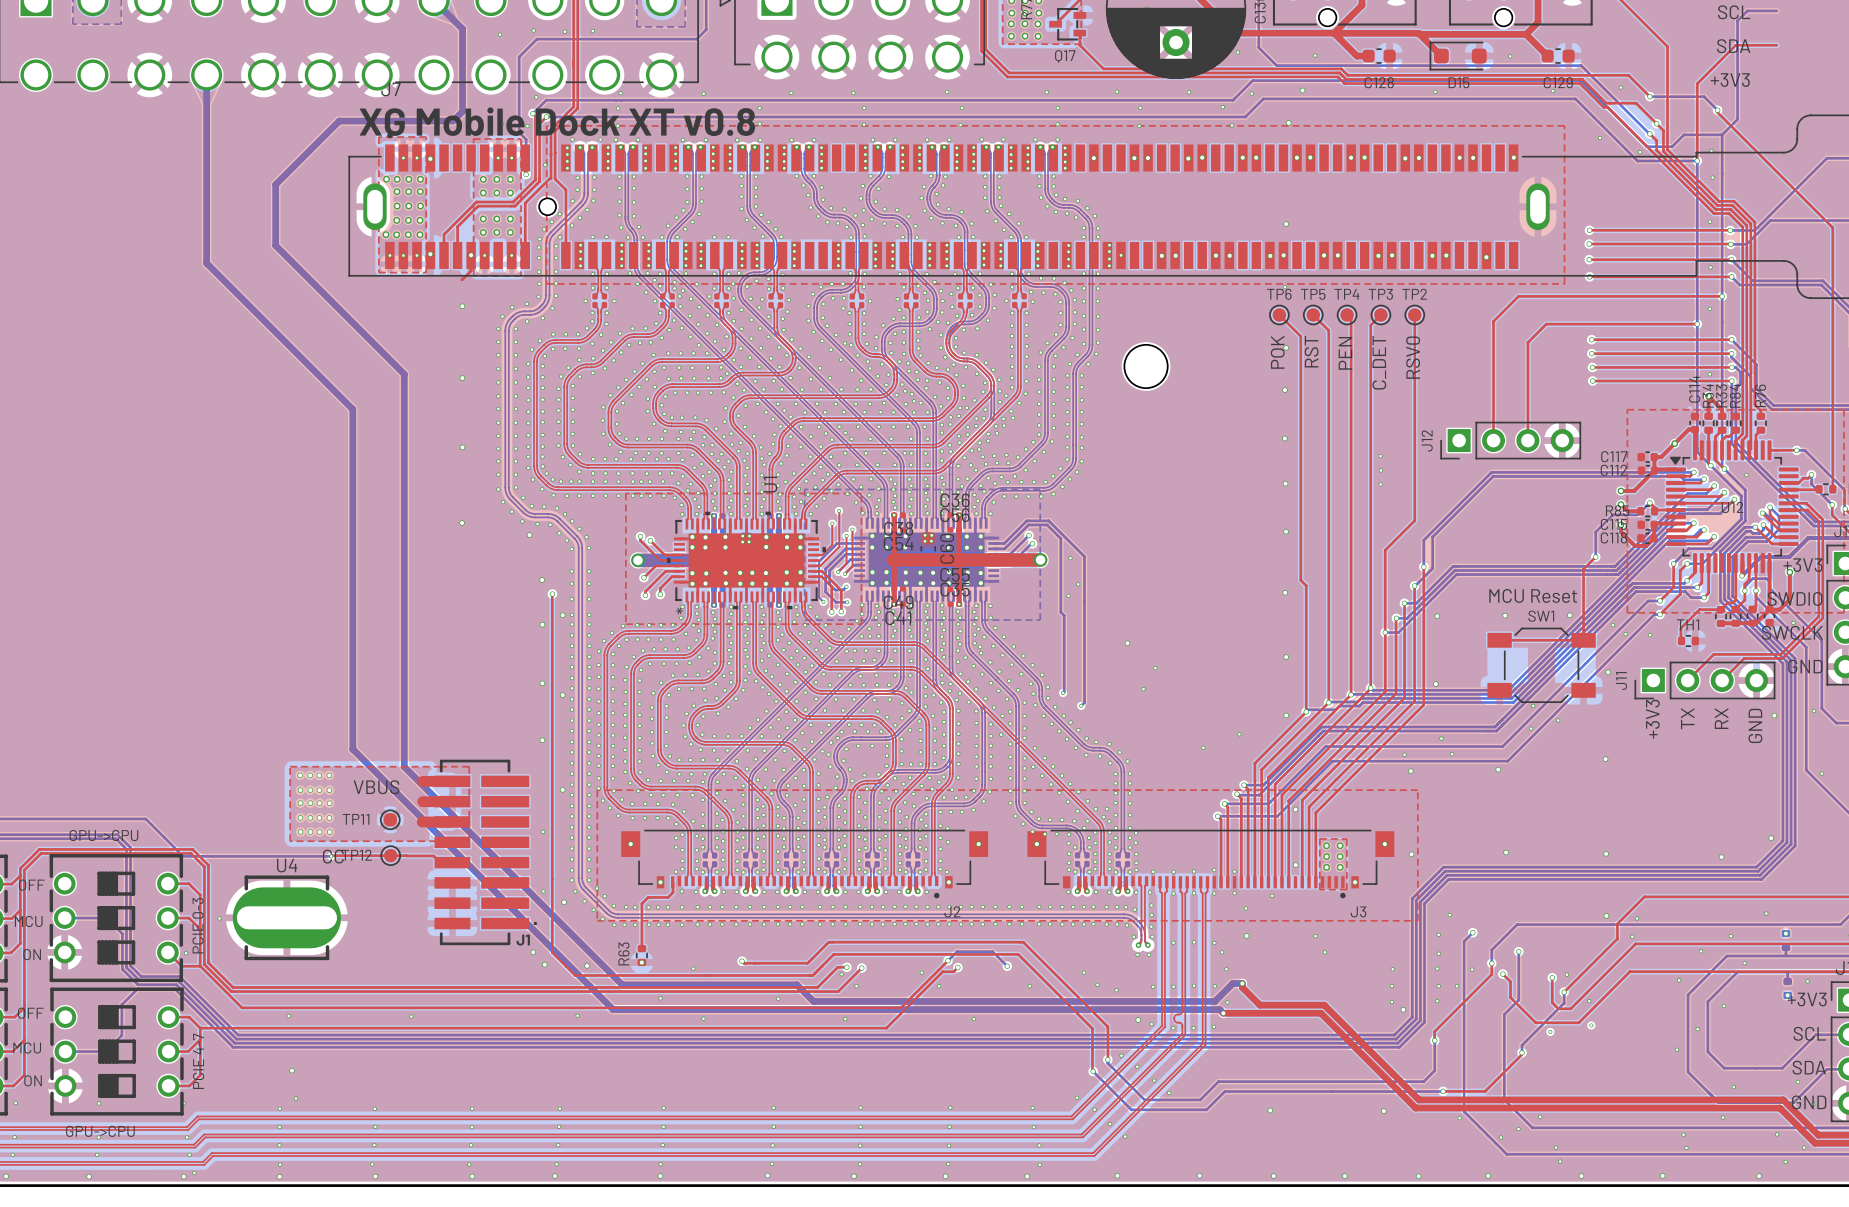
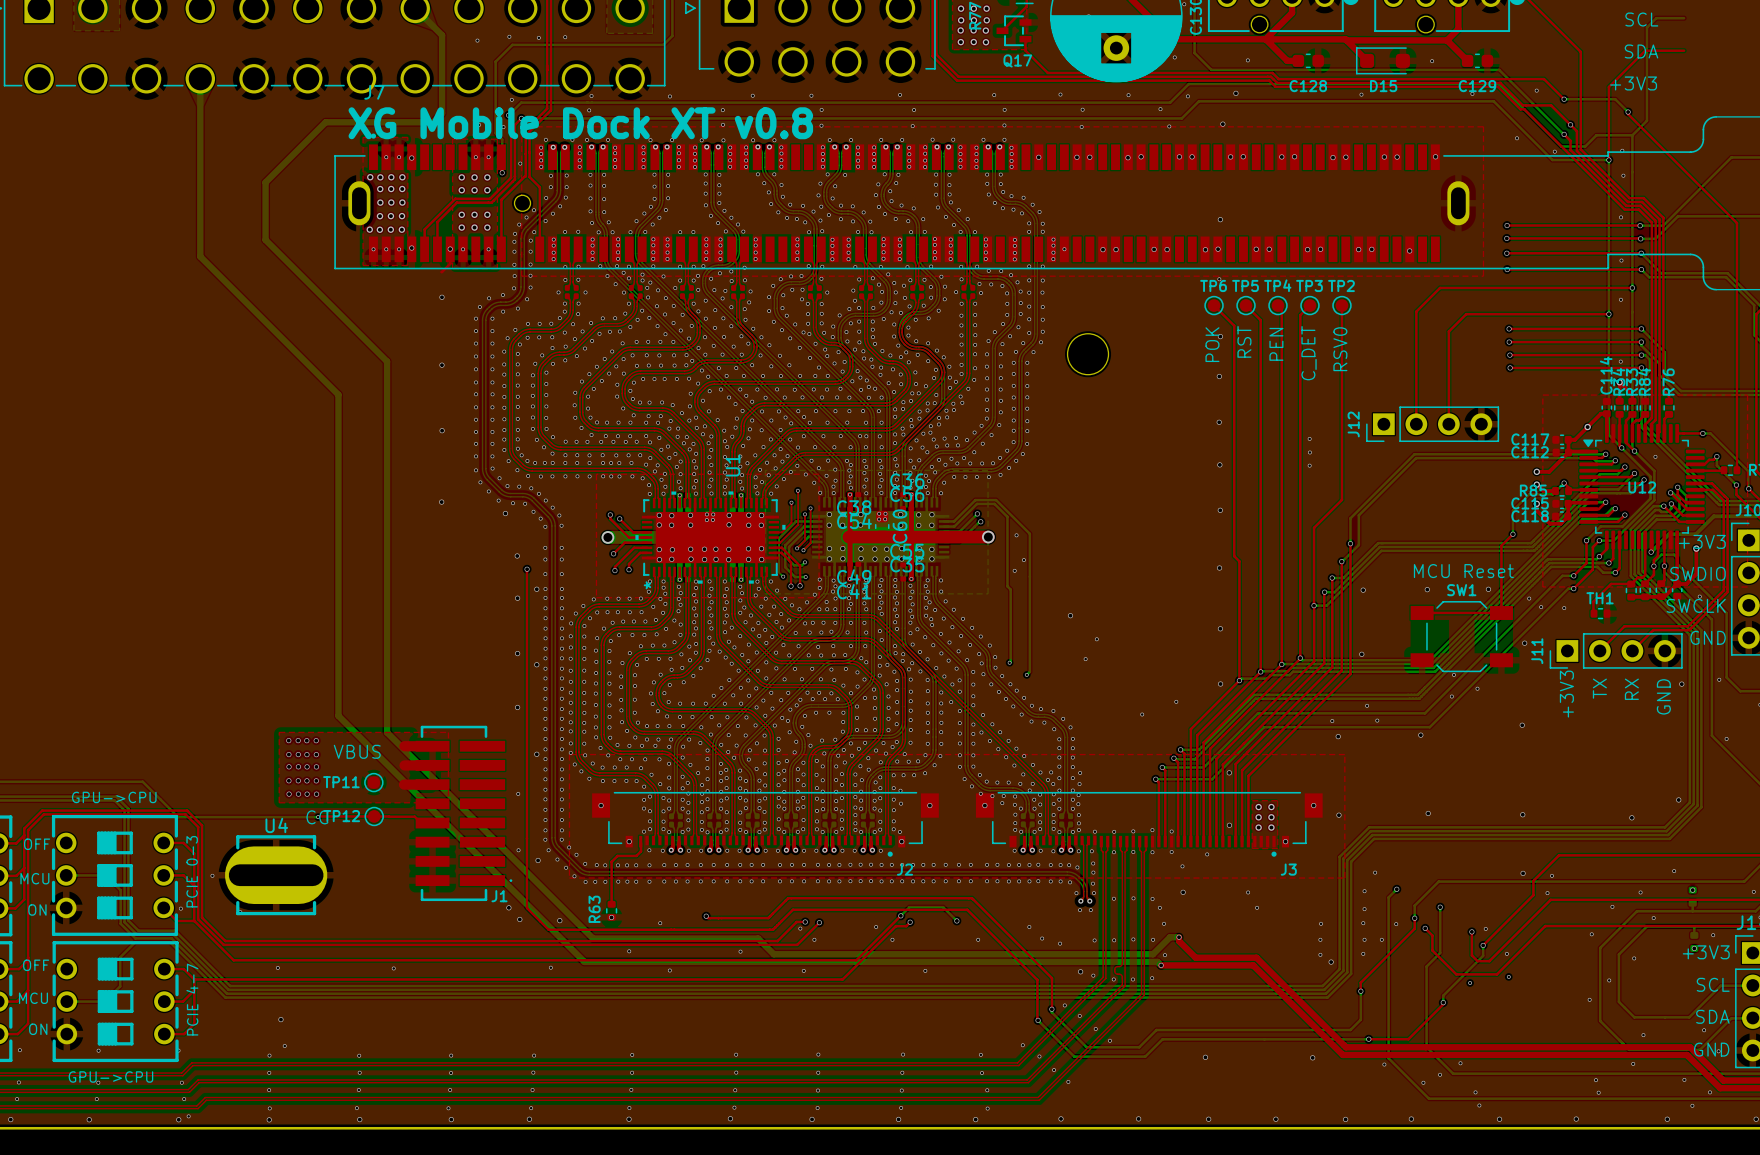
via: none -> (1080, 772)
via: none -> (1079, 784)
via: none -> (1002, 803)

